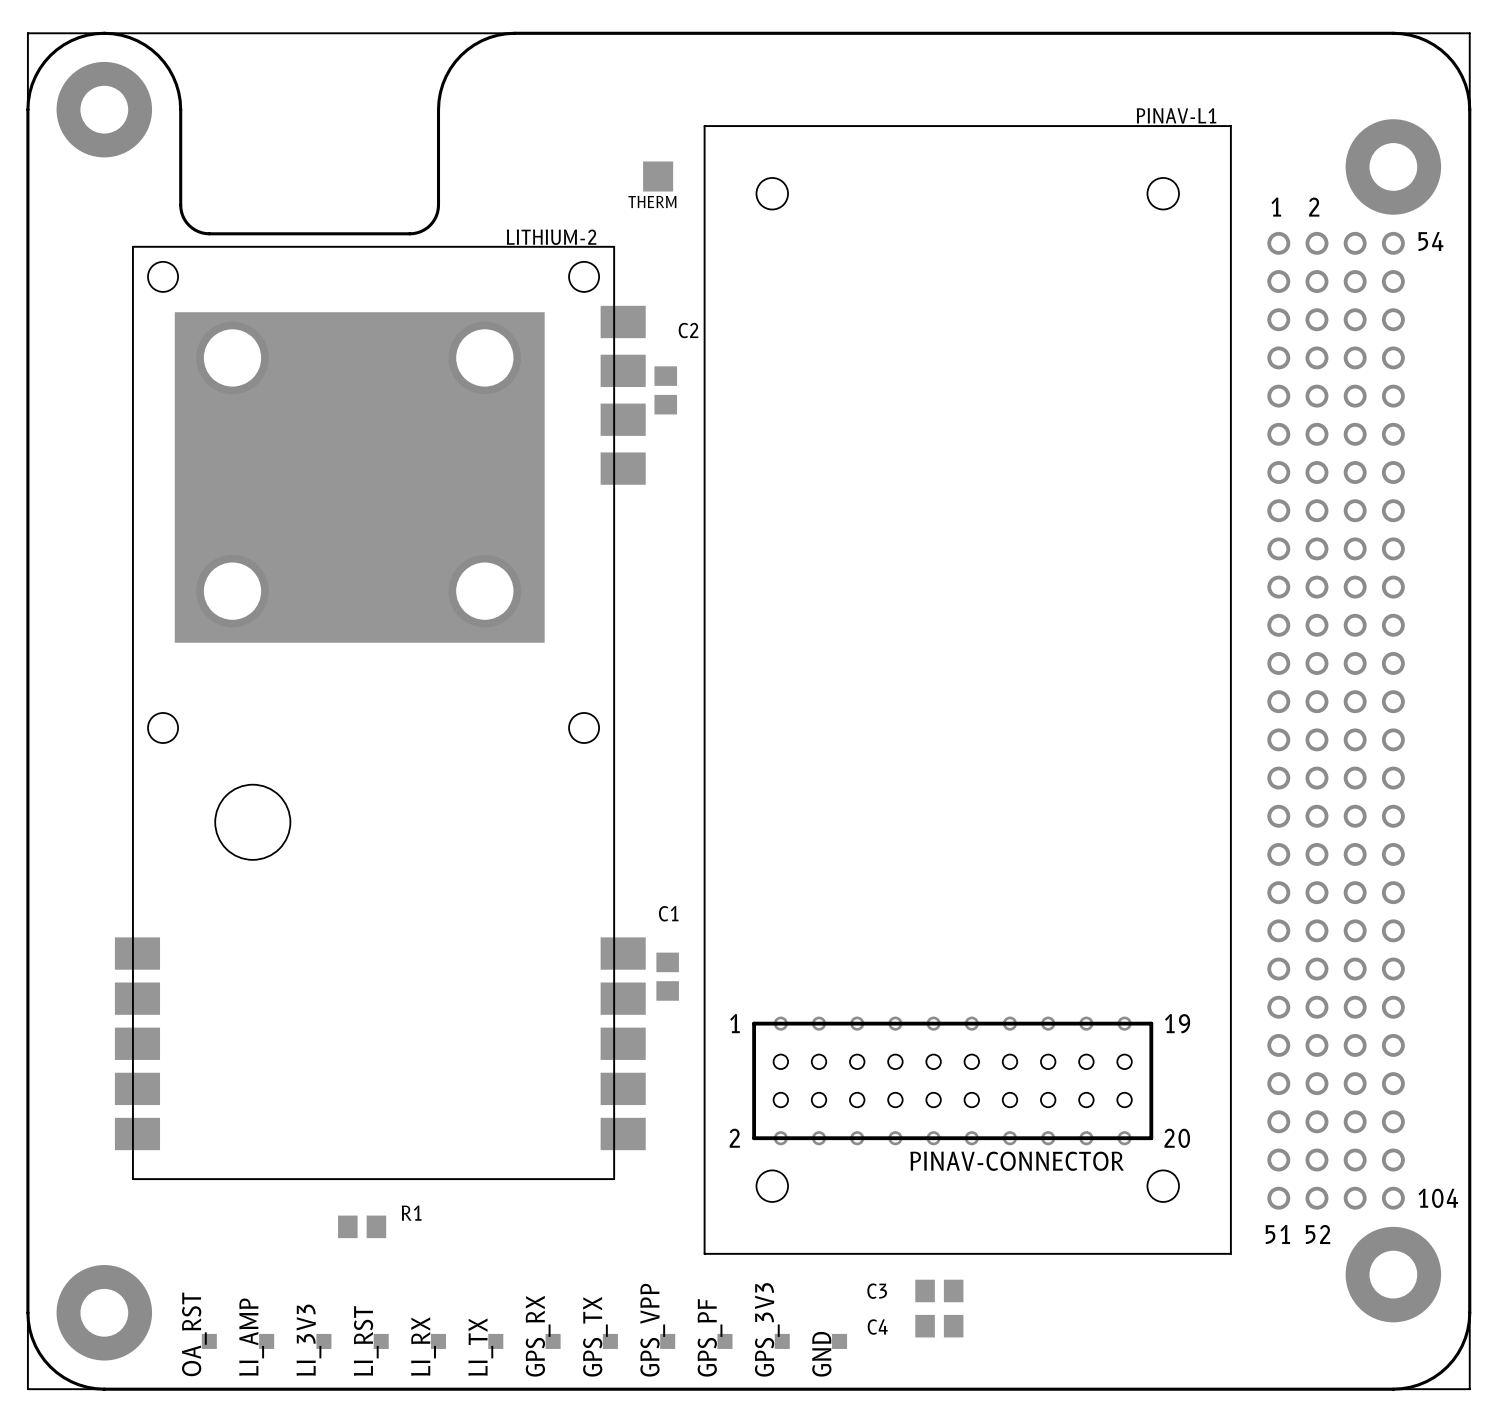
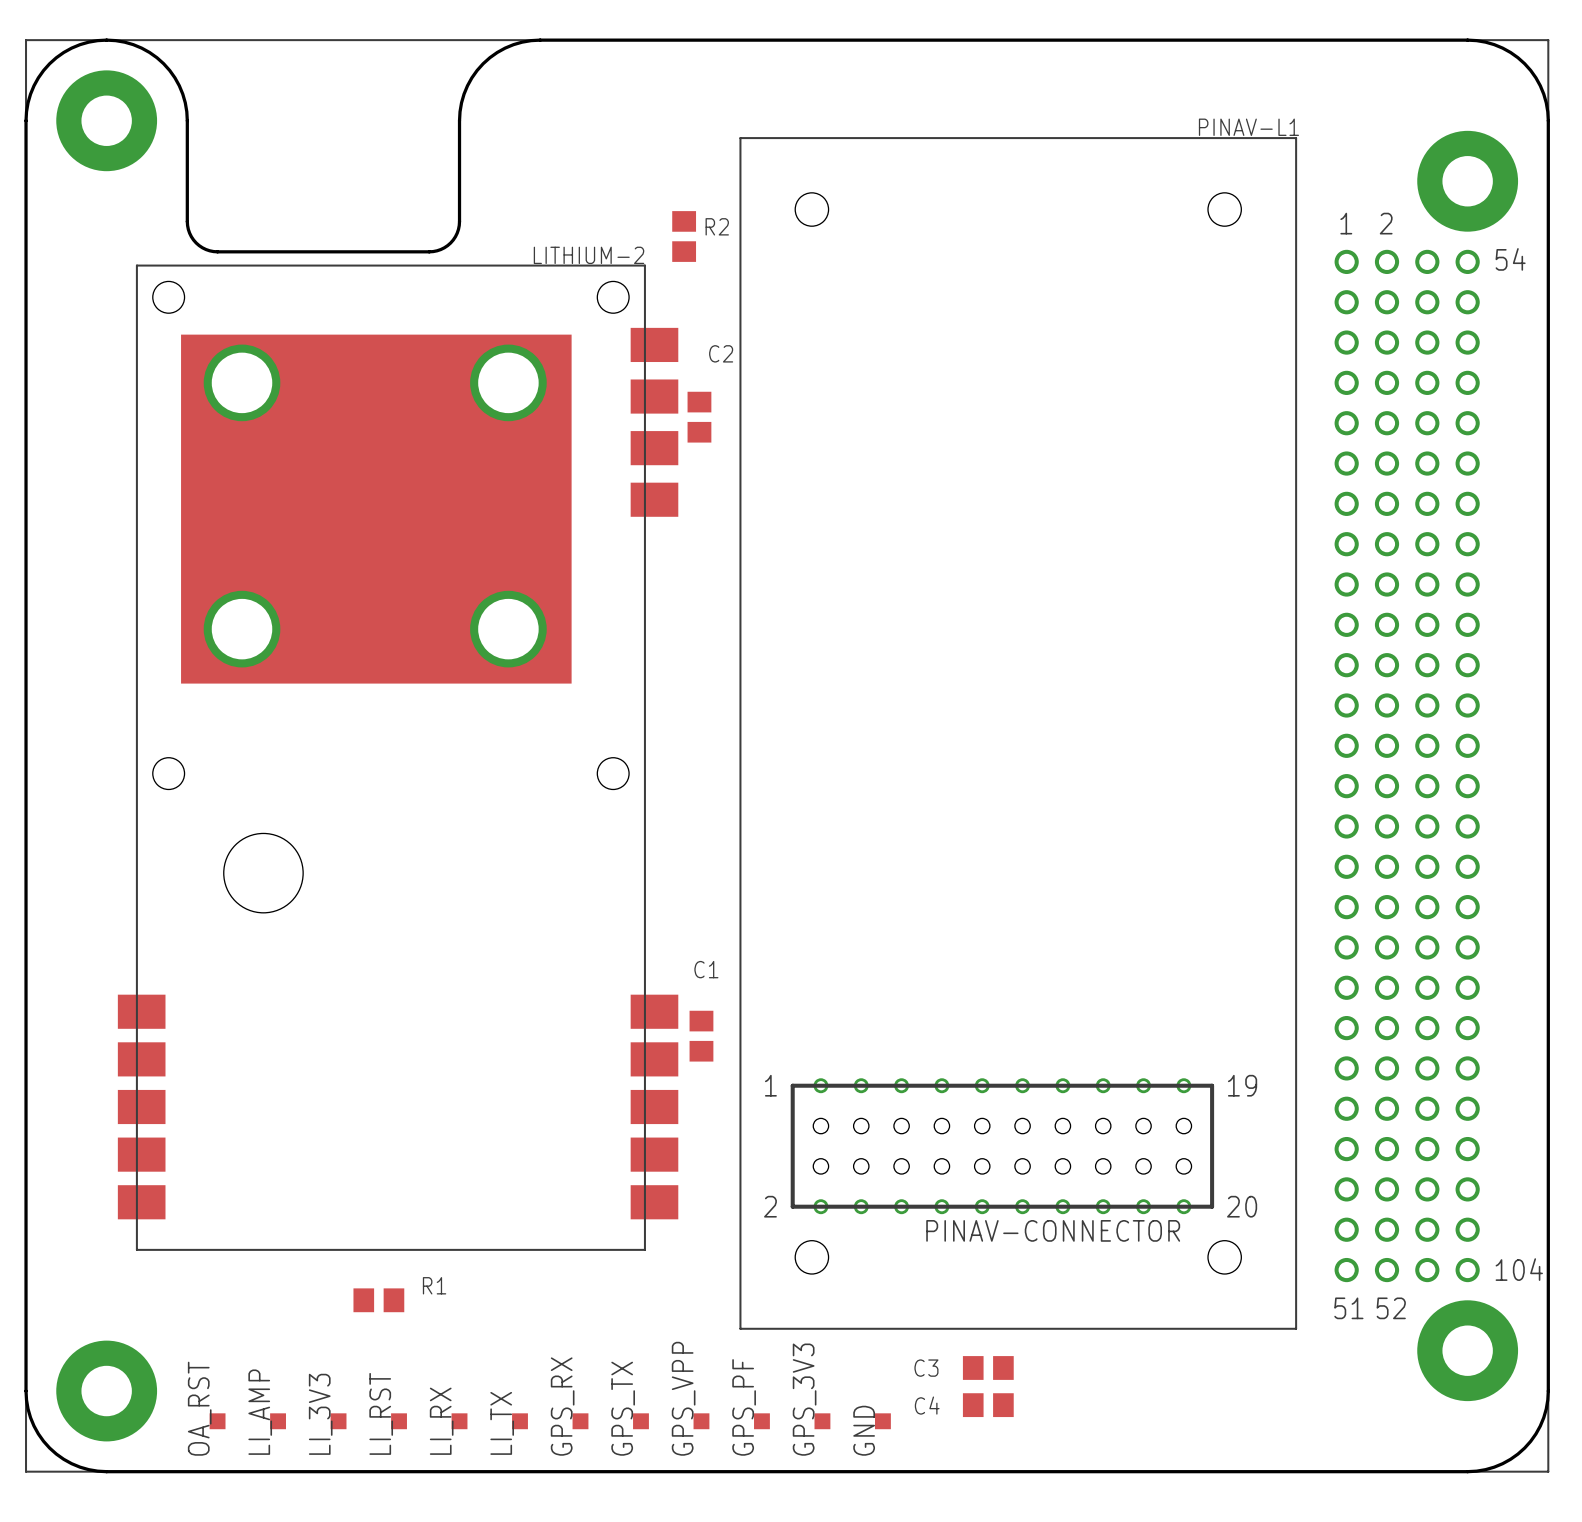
THERM: (658, 176) -> none
R2: none -> (684, 236)

